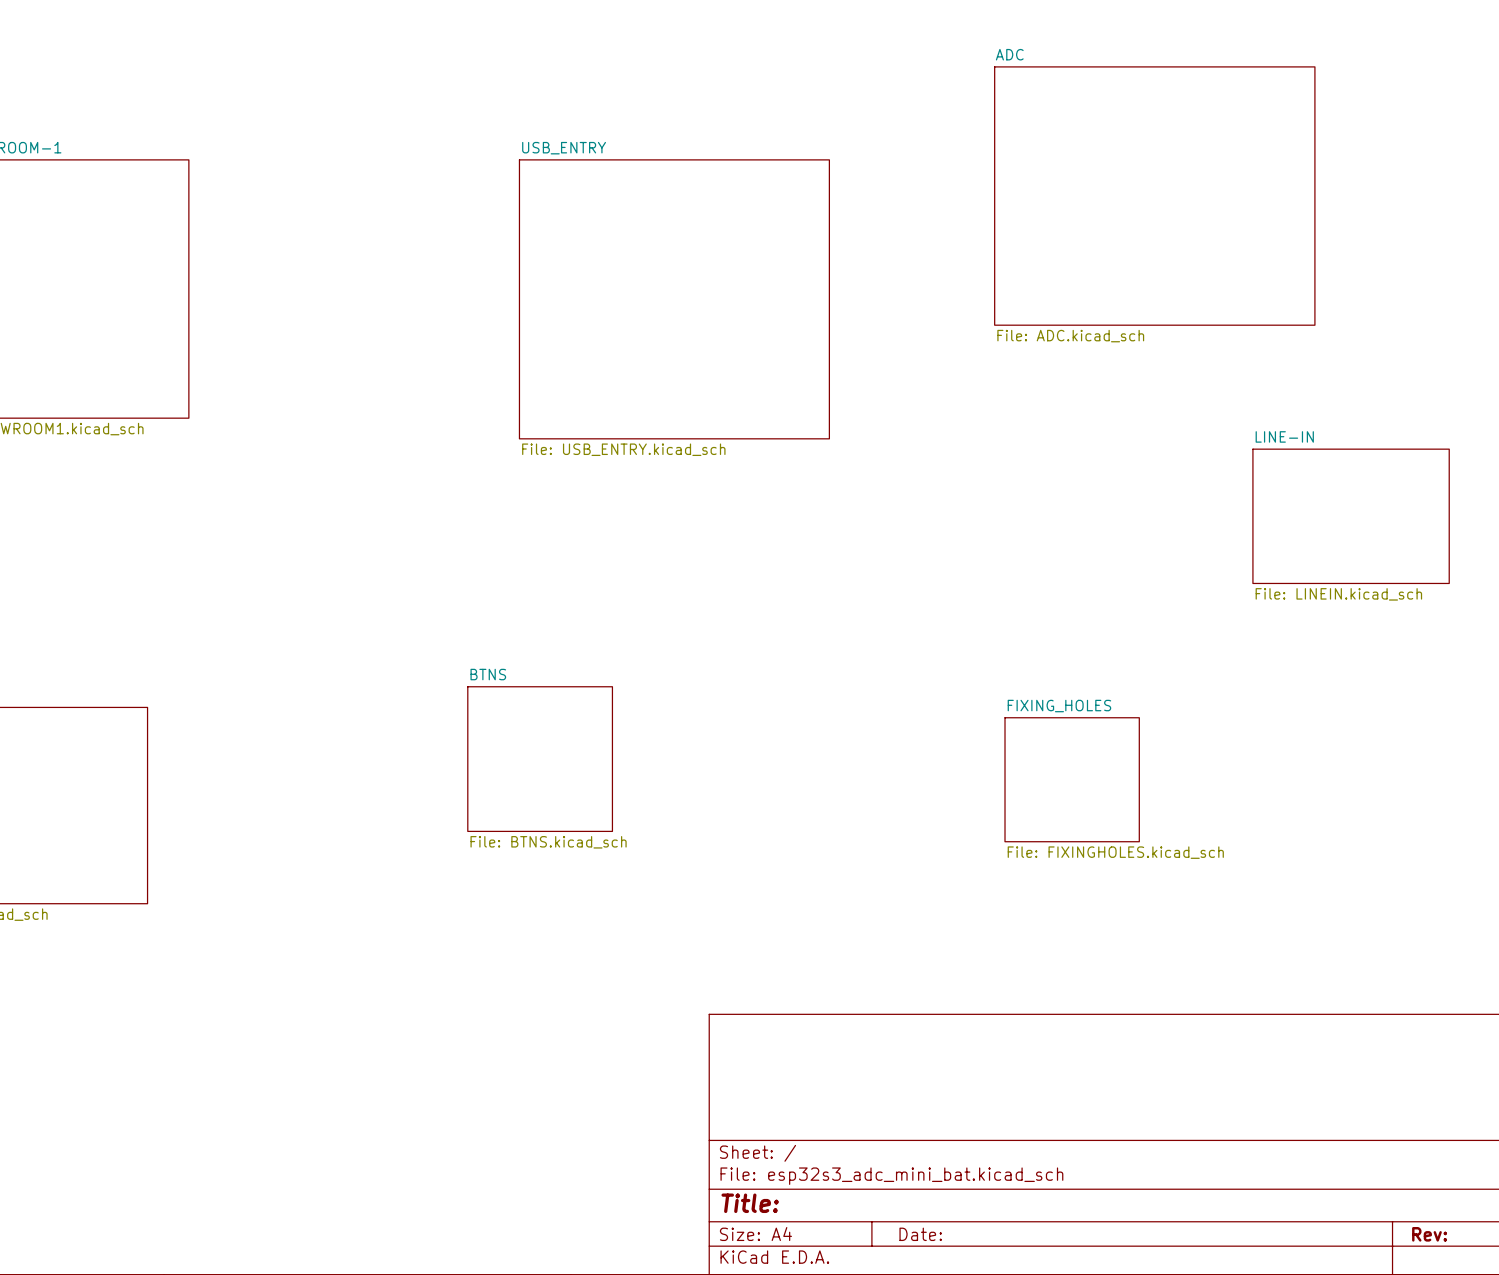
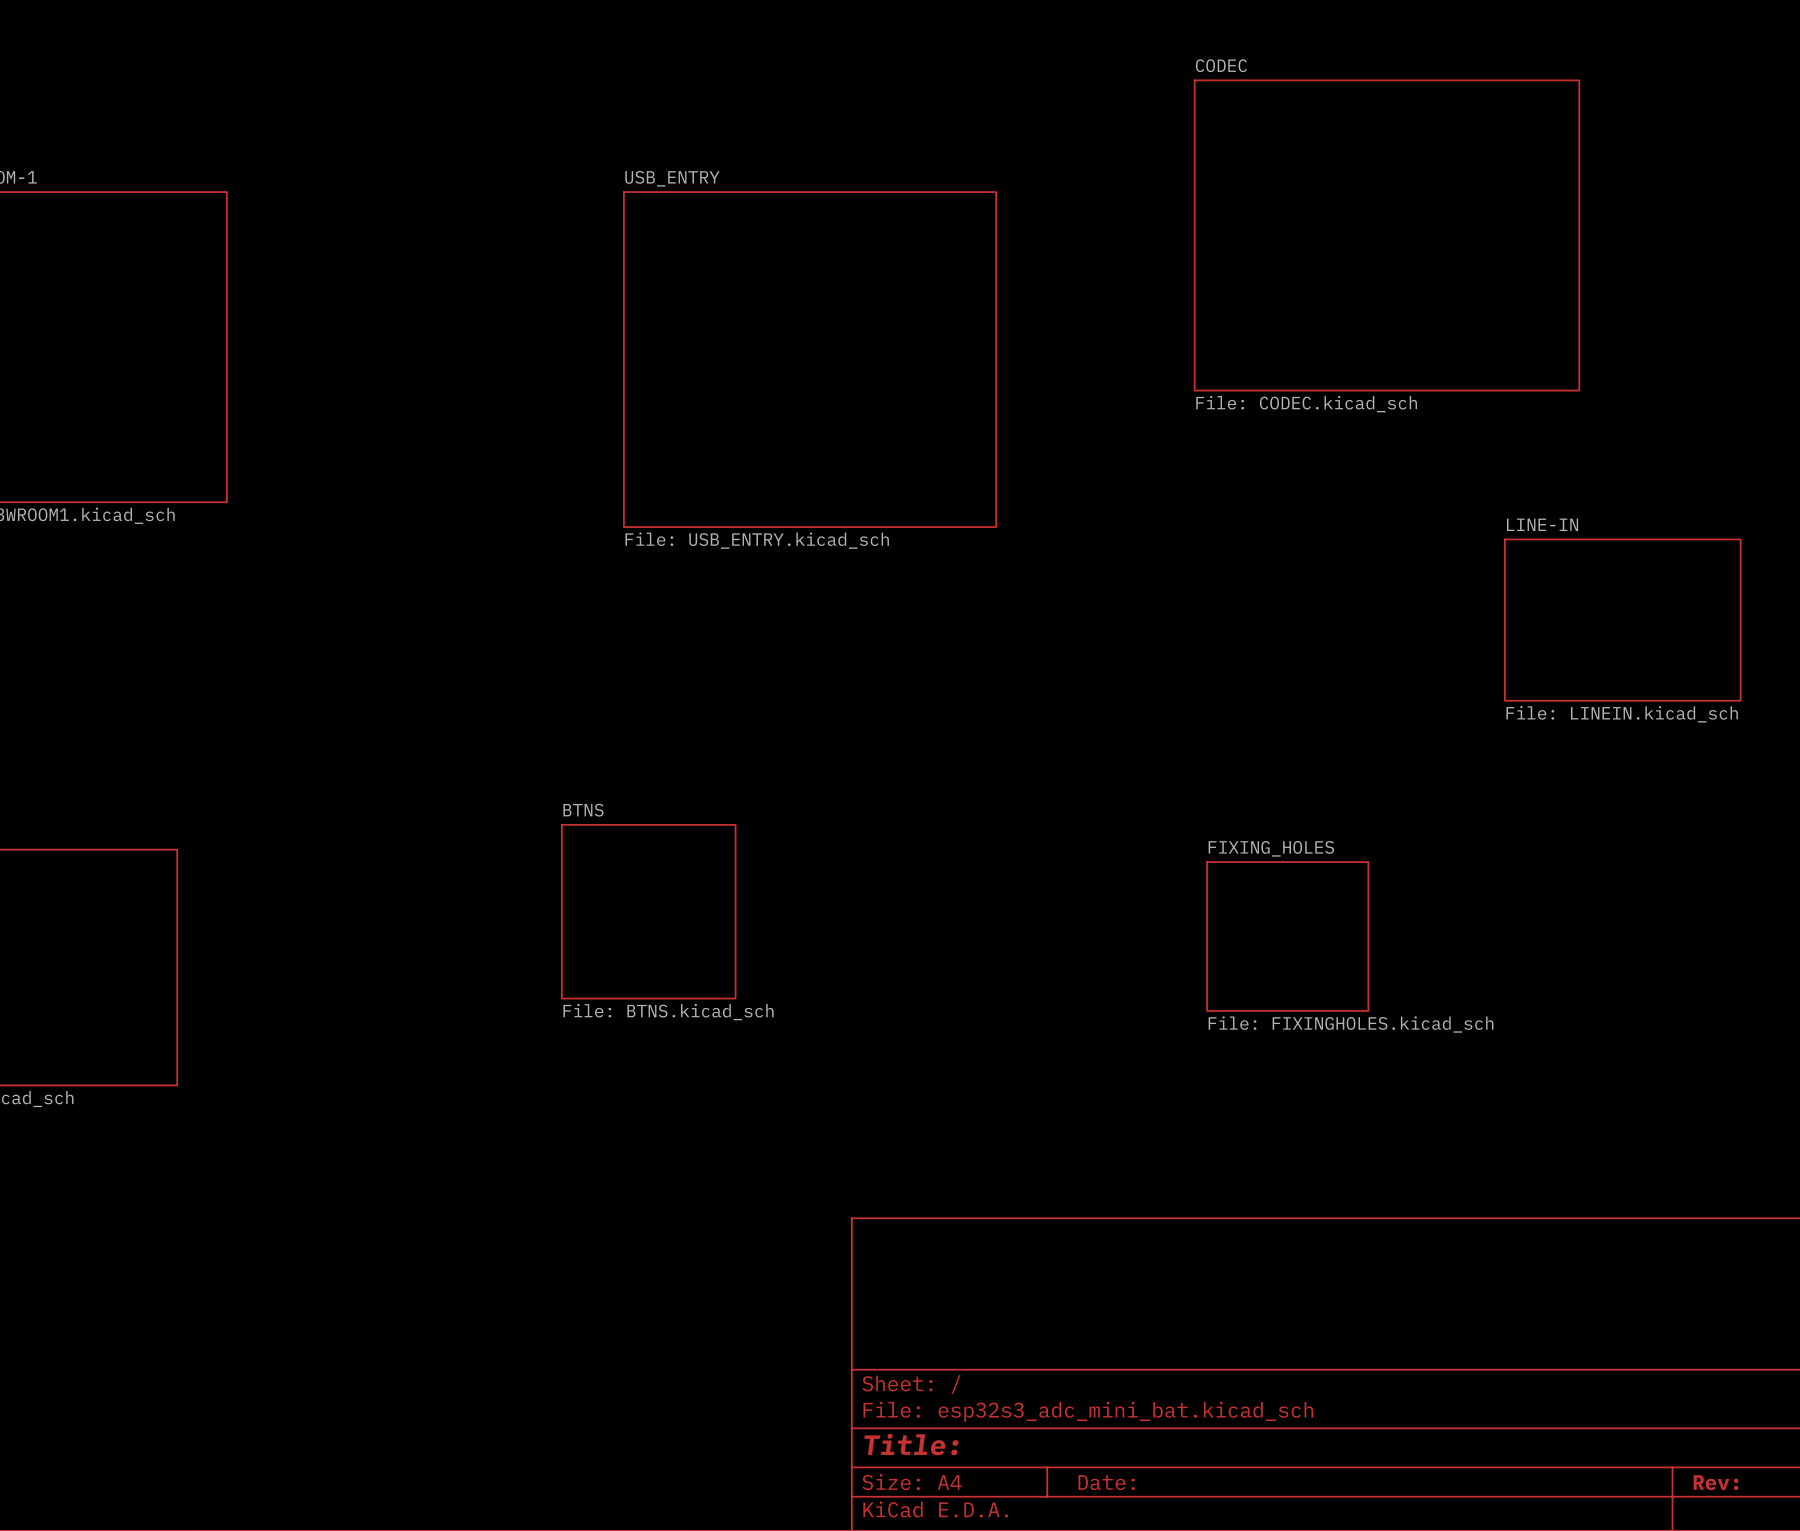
sheet ADC name: ADC (1009, 54) -> CODEC (1221, 65)
sheet ADC value: File: ADC.kicad_sch (1070, 336) -> File: CODEC.kicad_sch (1306, 404)

